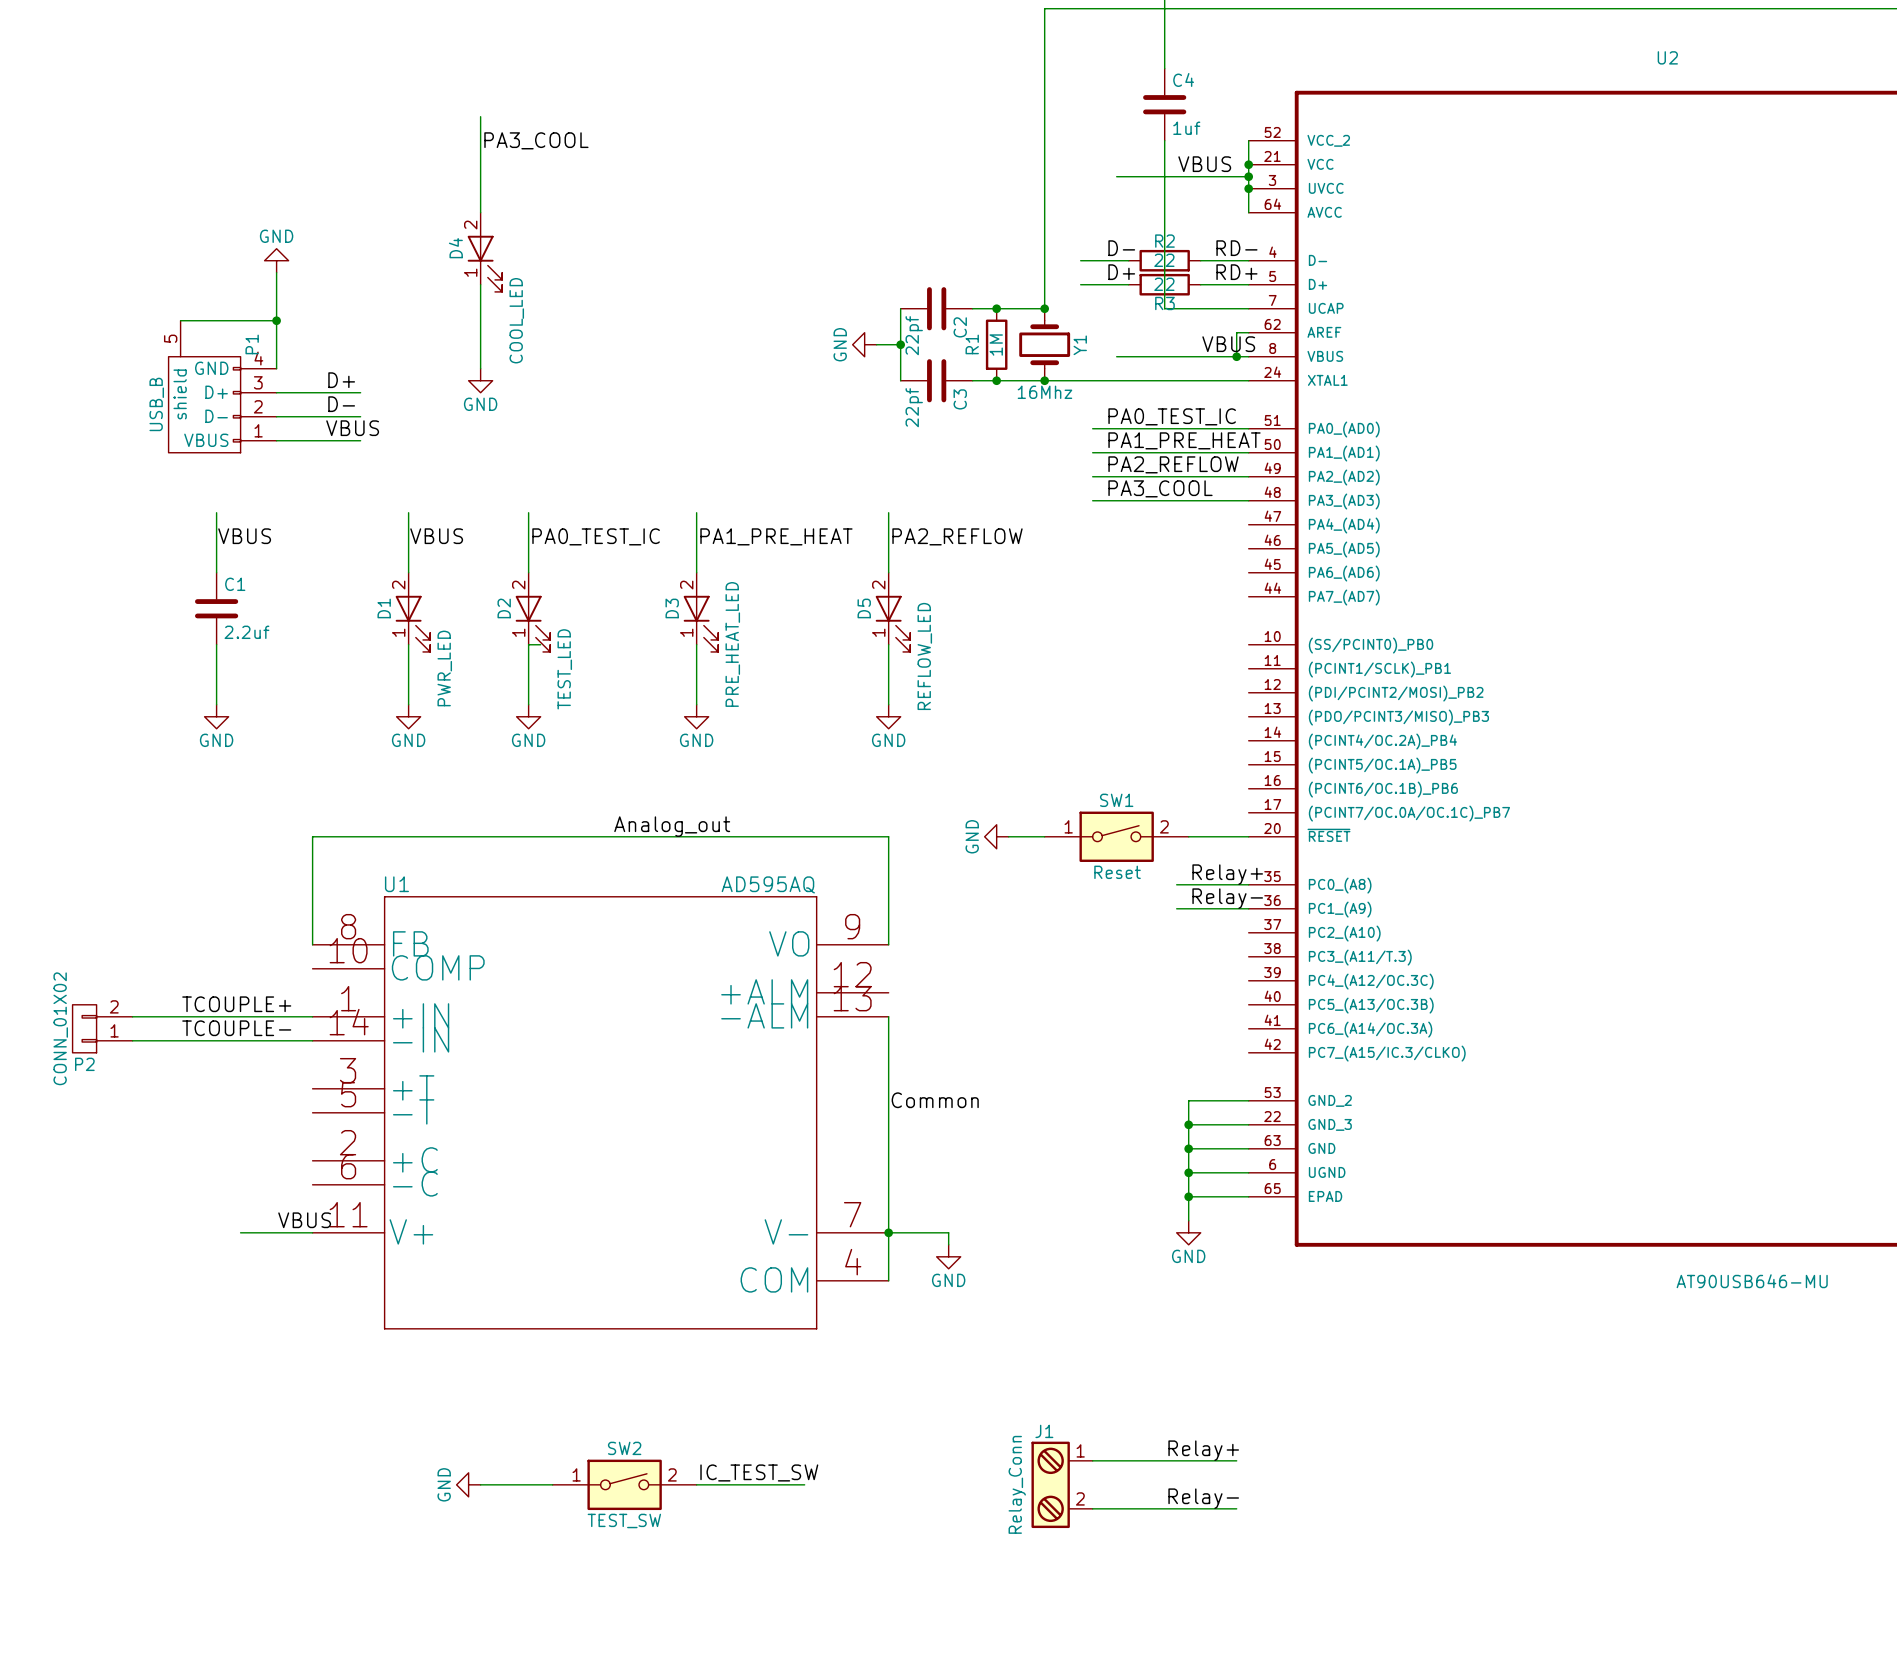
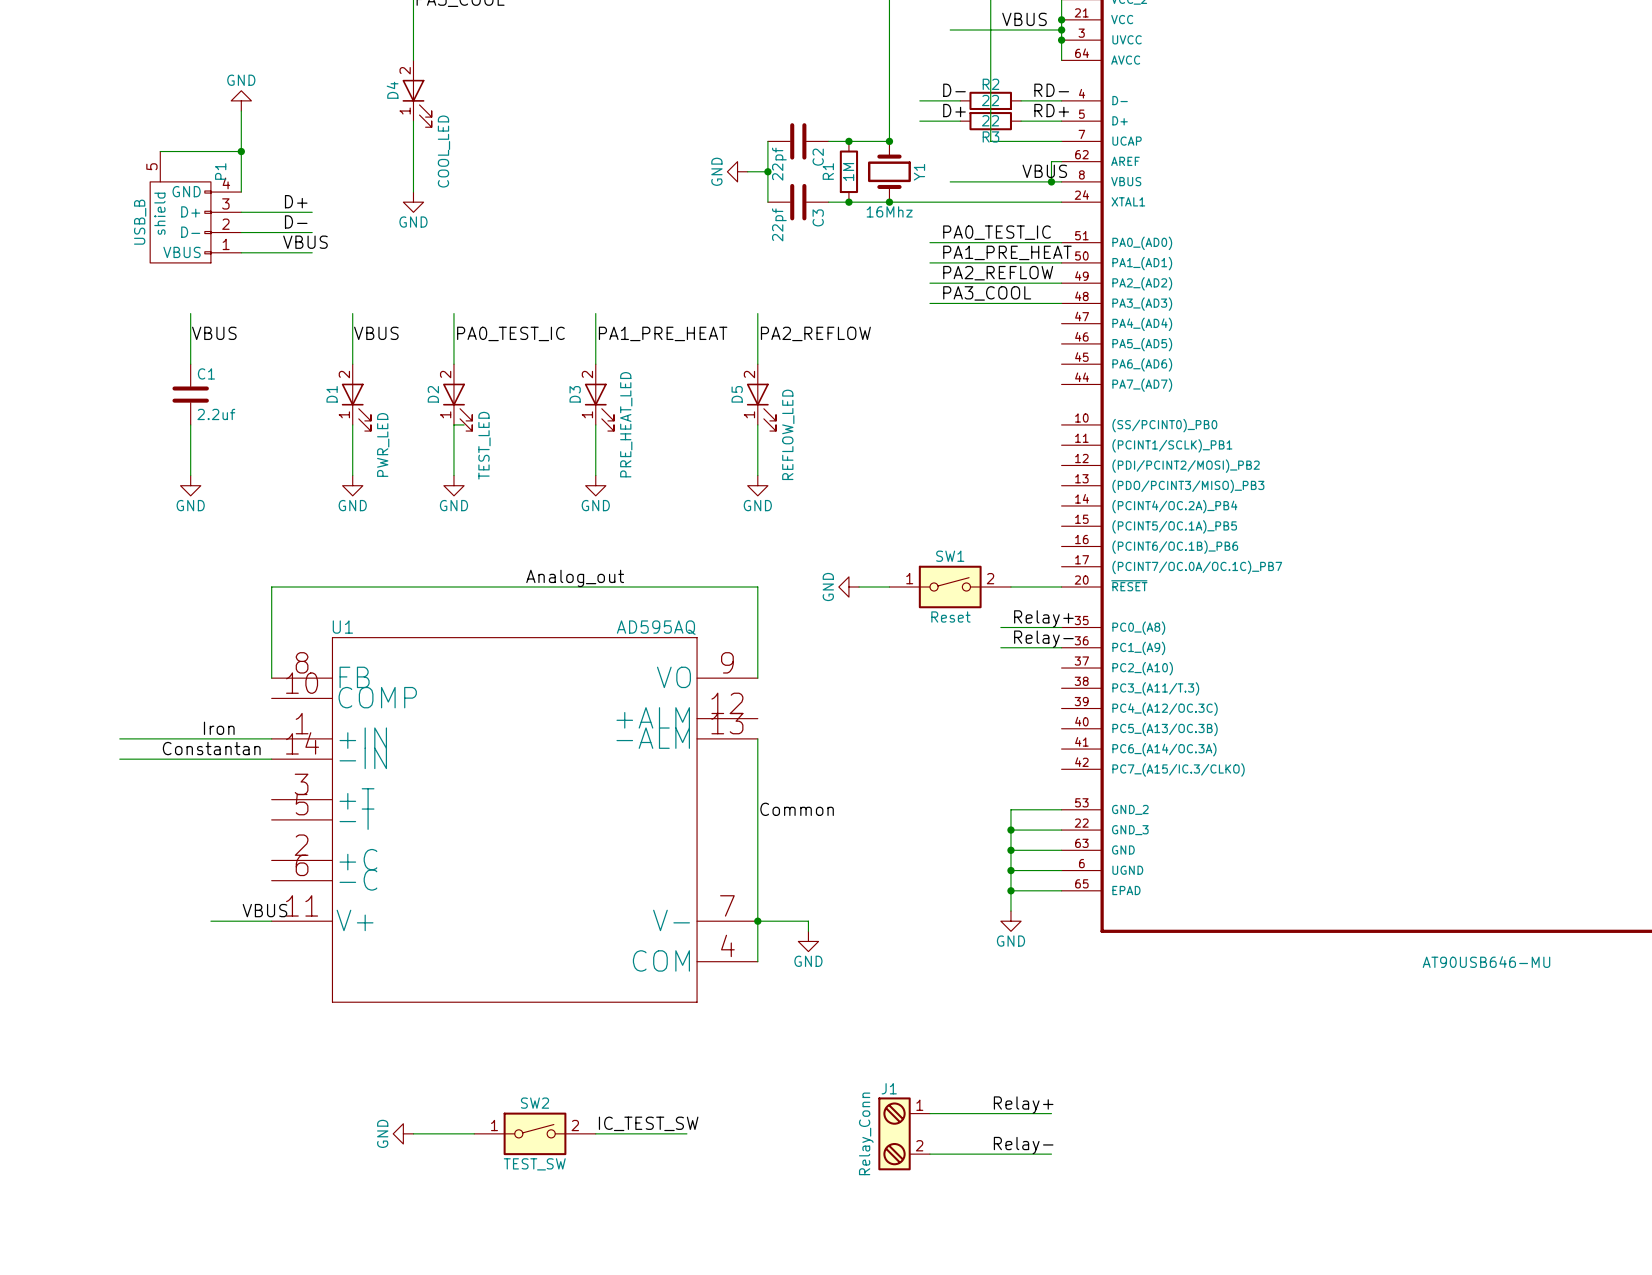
label: TCOUPLE+ (236, 1004) -> none
label: none -> Iron (219, 728)
P2: CONN_01X02 (102, 1028) -> none
label: TCOUPLE- (236, 1028) -> Constantan (211, 748)

